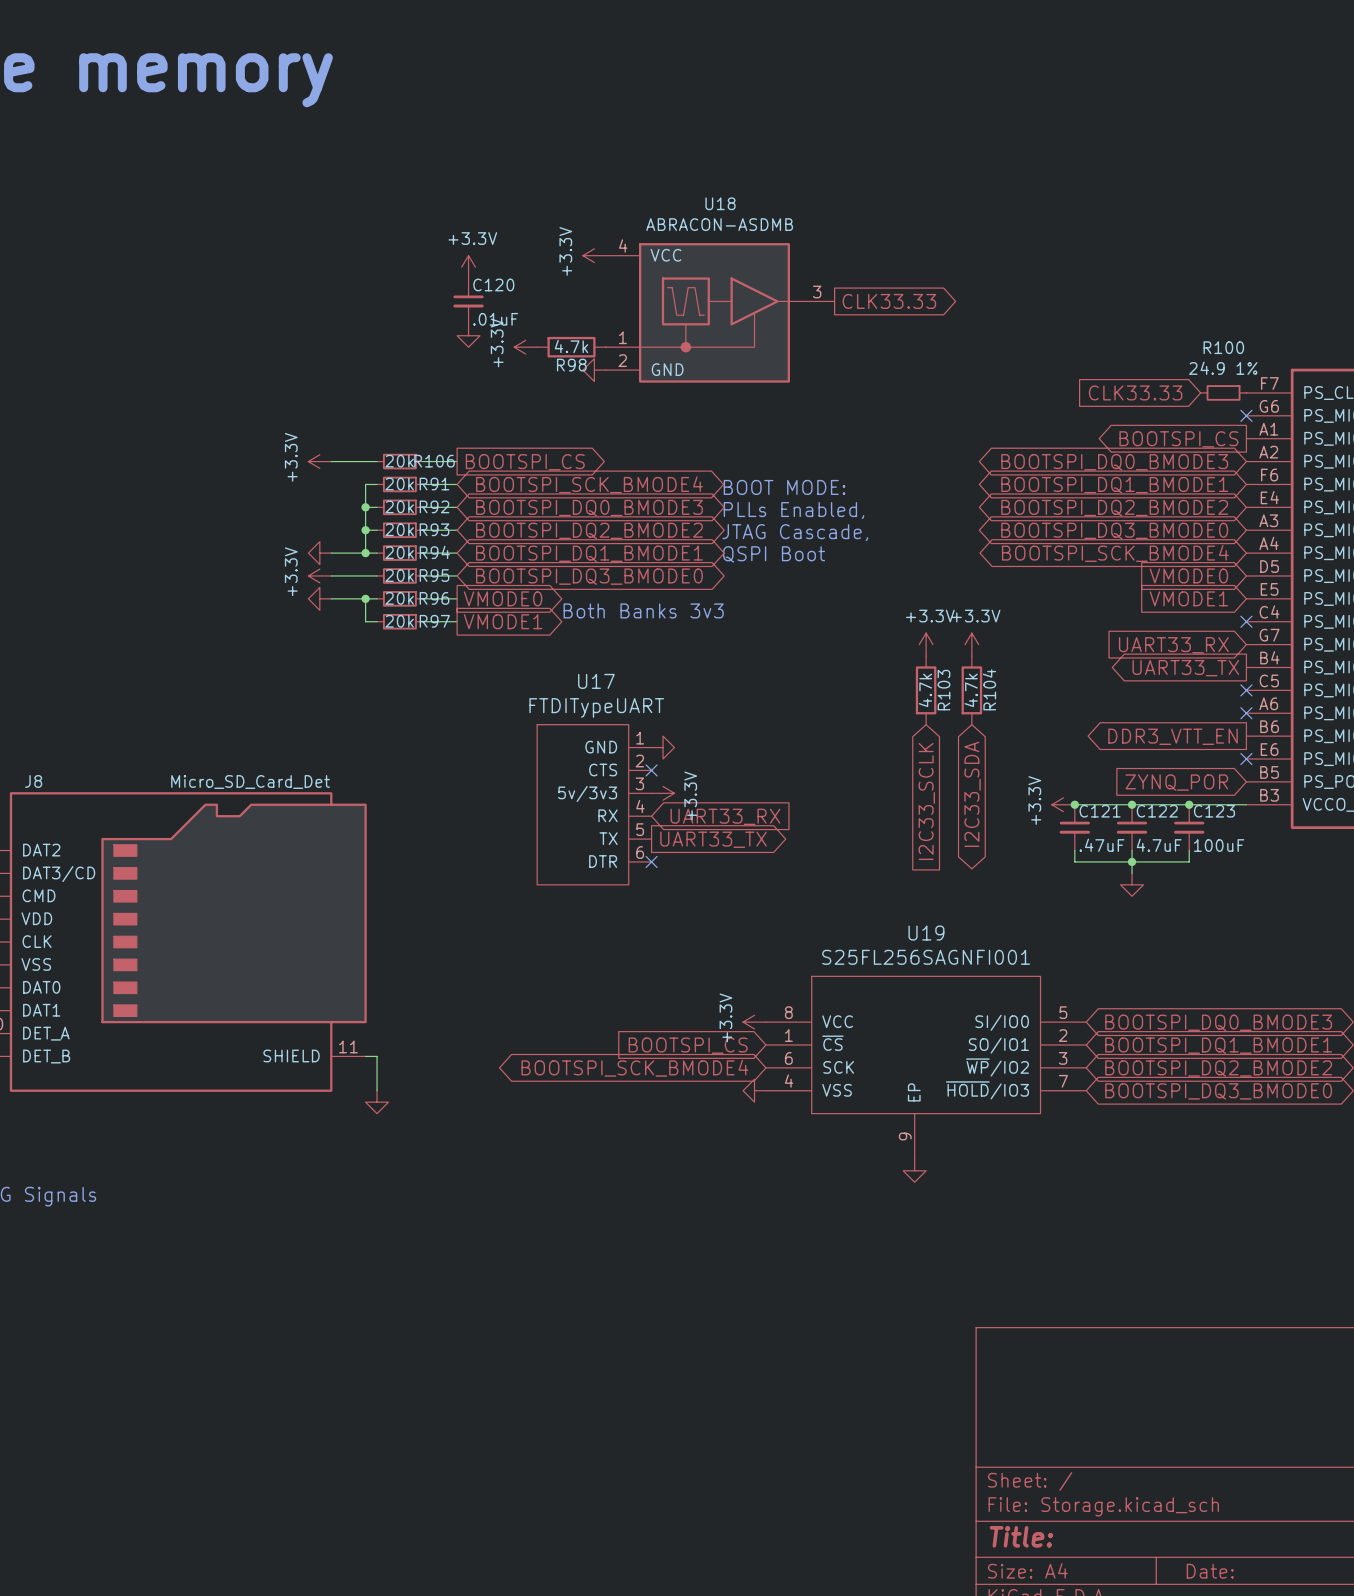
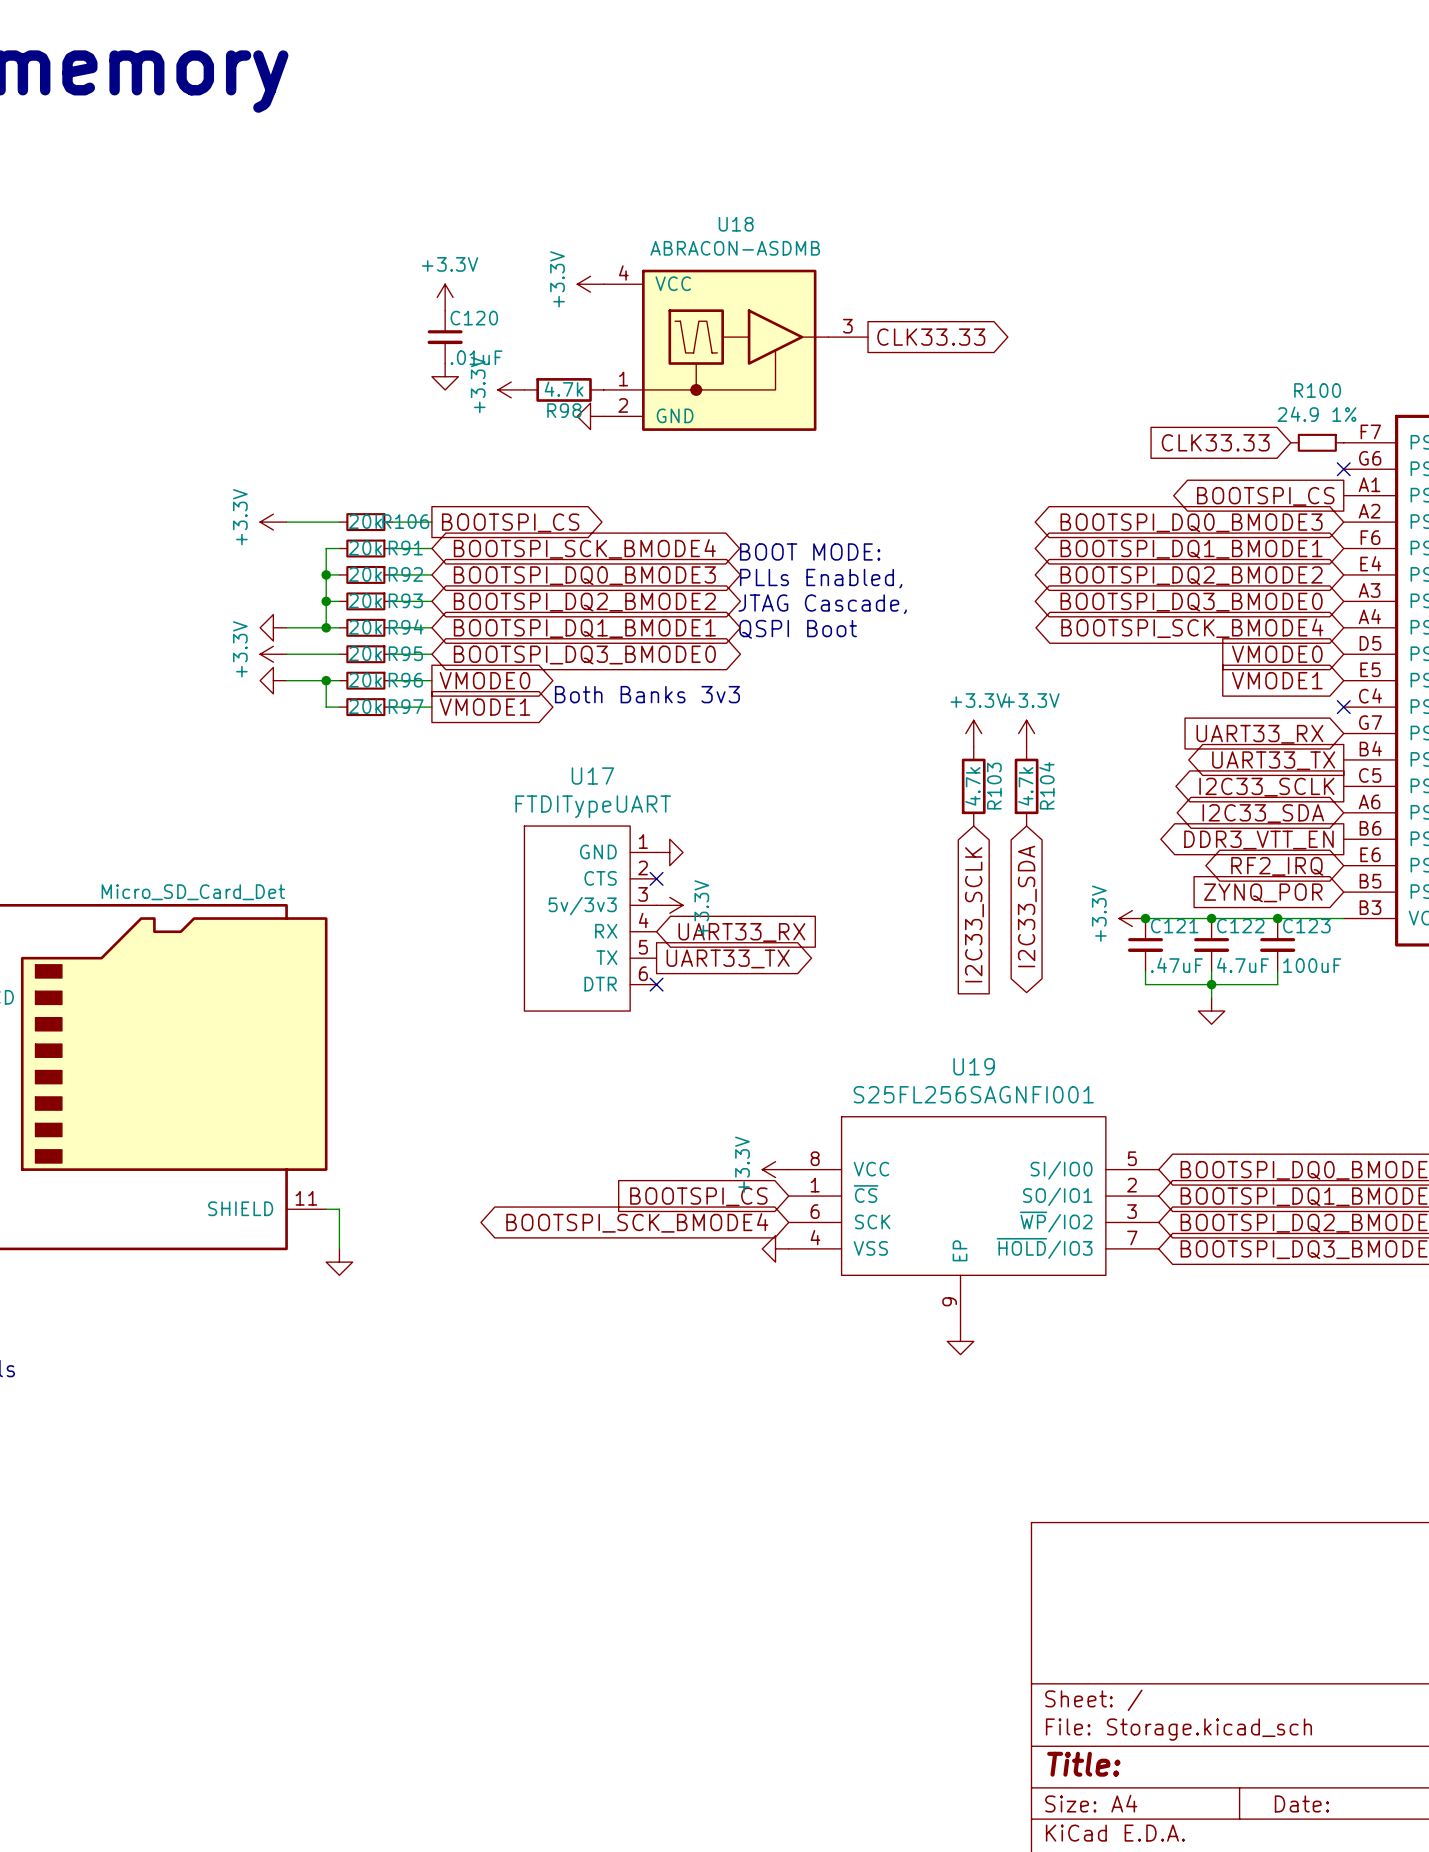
no-connect mark: (1246, 690) -> none
global label: none -> I2C33_SCLK (1266, 787)
global label: none -> I2C33_SDA (1263, 813)
no-connect mark: (1246, 713) -> none
global label: none -> RF2_IRQ (1277, 866)
no-connect mark: (1246, 759) -> none

